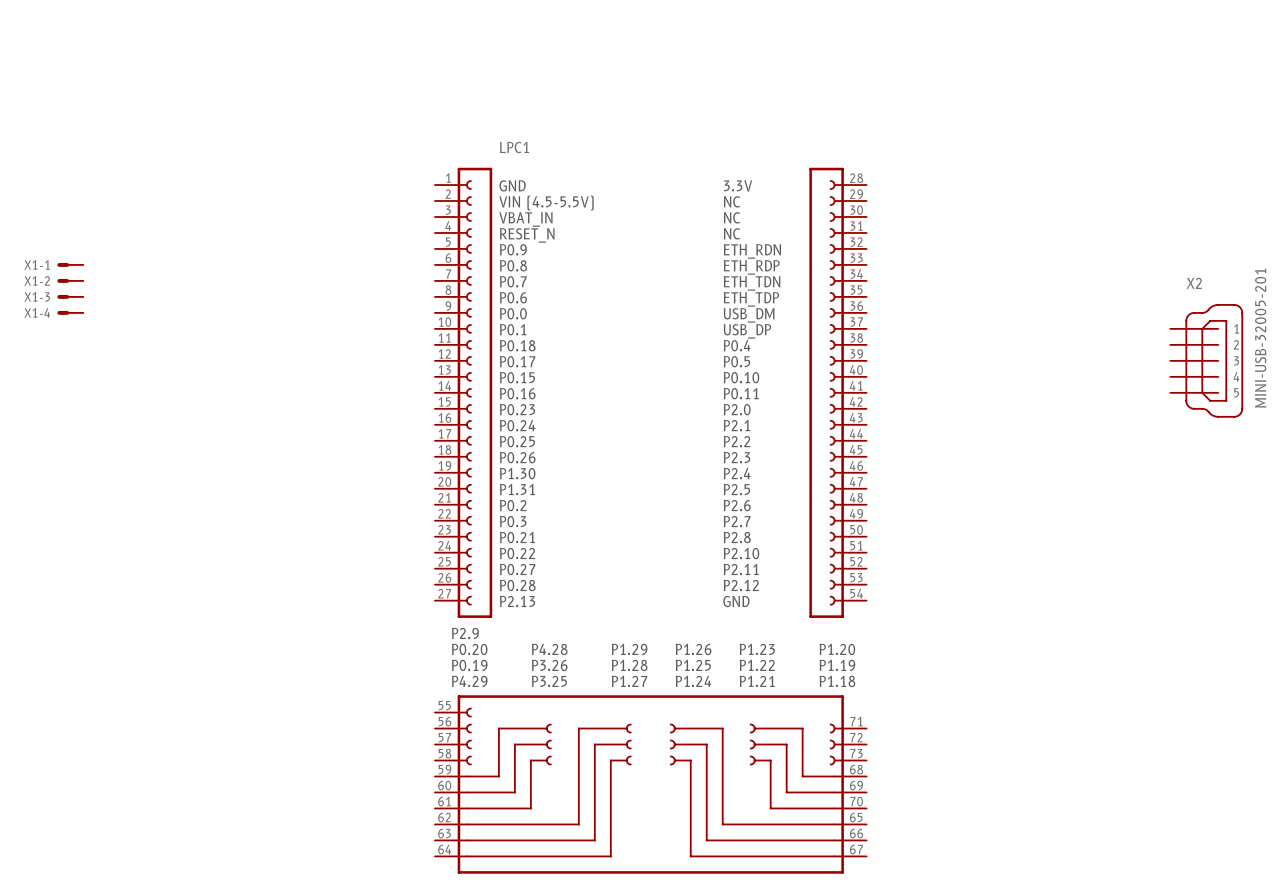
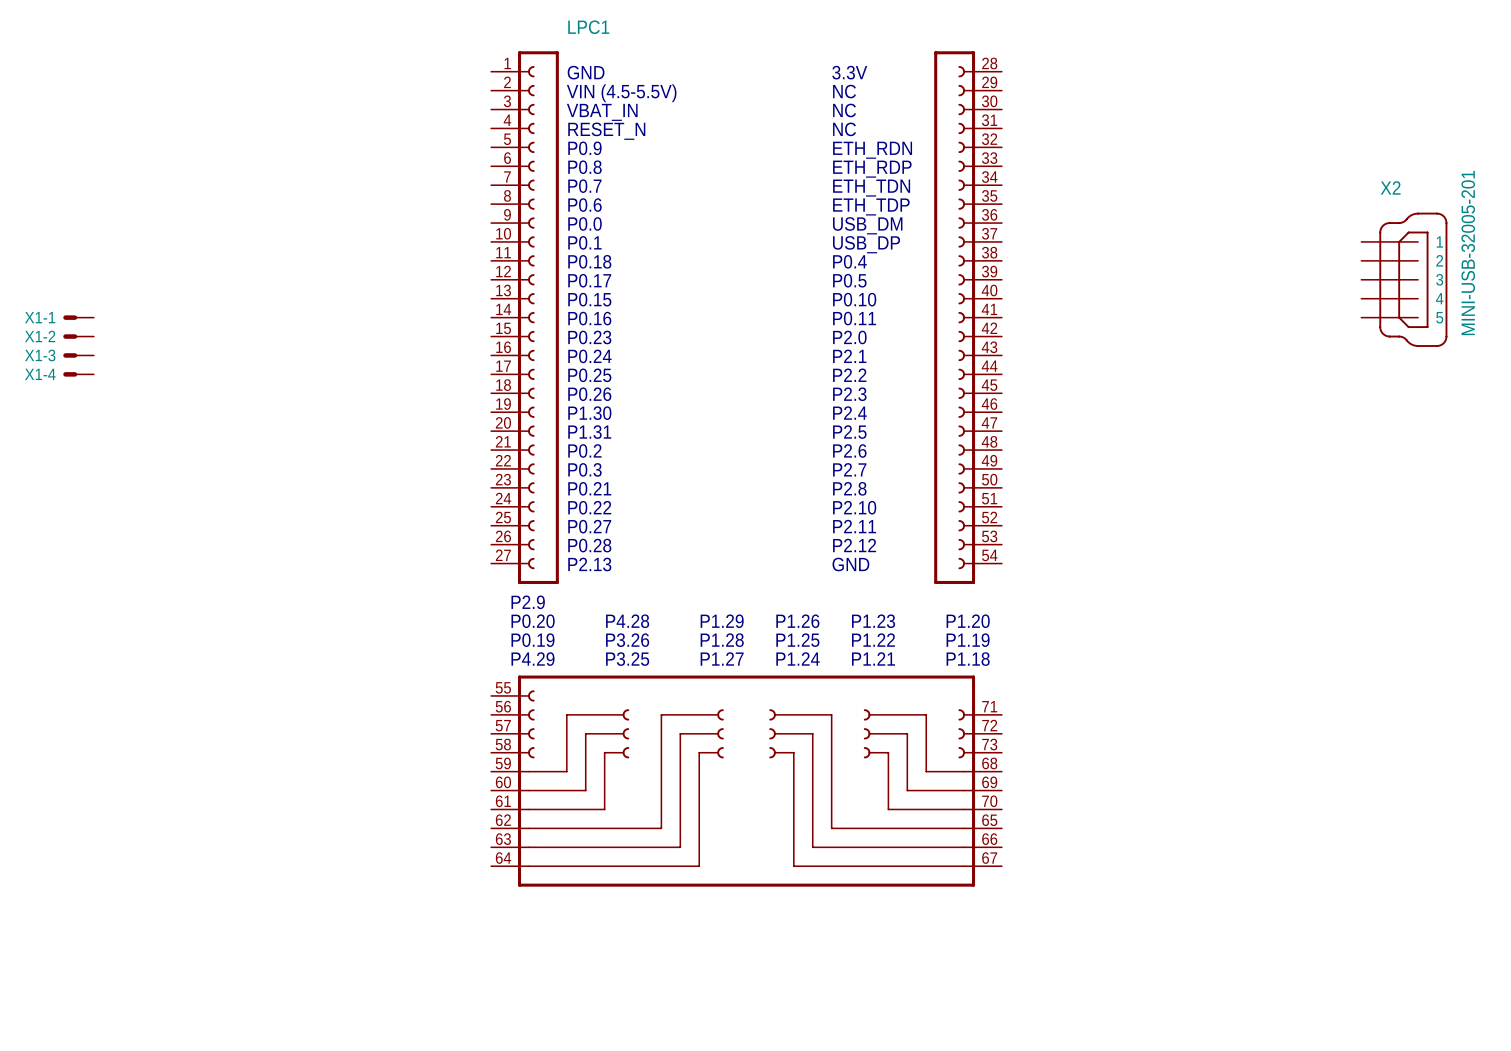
X2 position: (1206, 360) -> (1404, 279)
LPC1 position: (650, 520) -> (746, 468)

